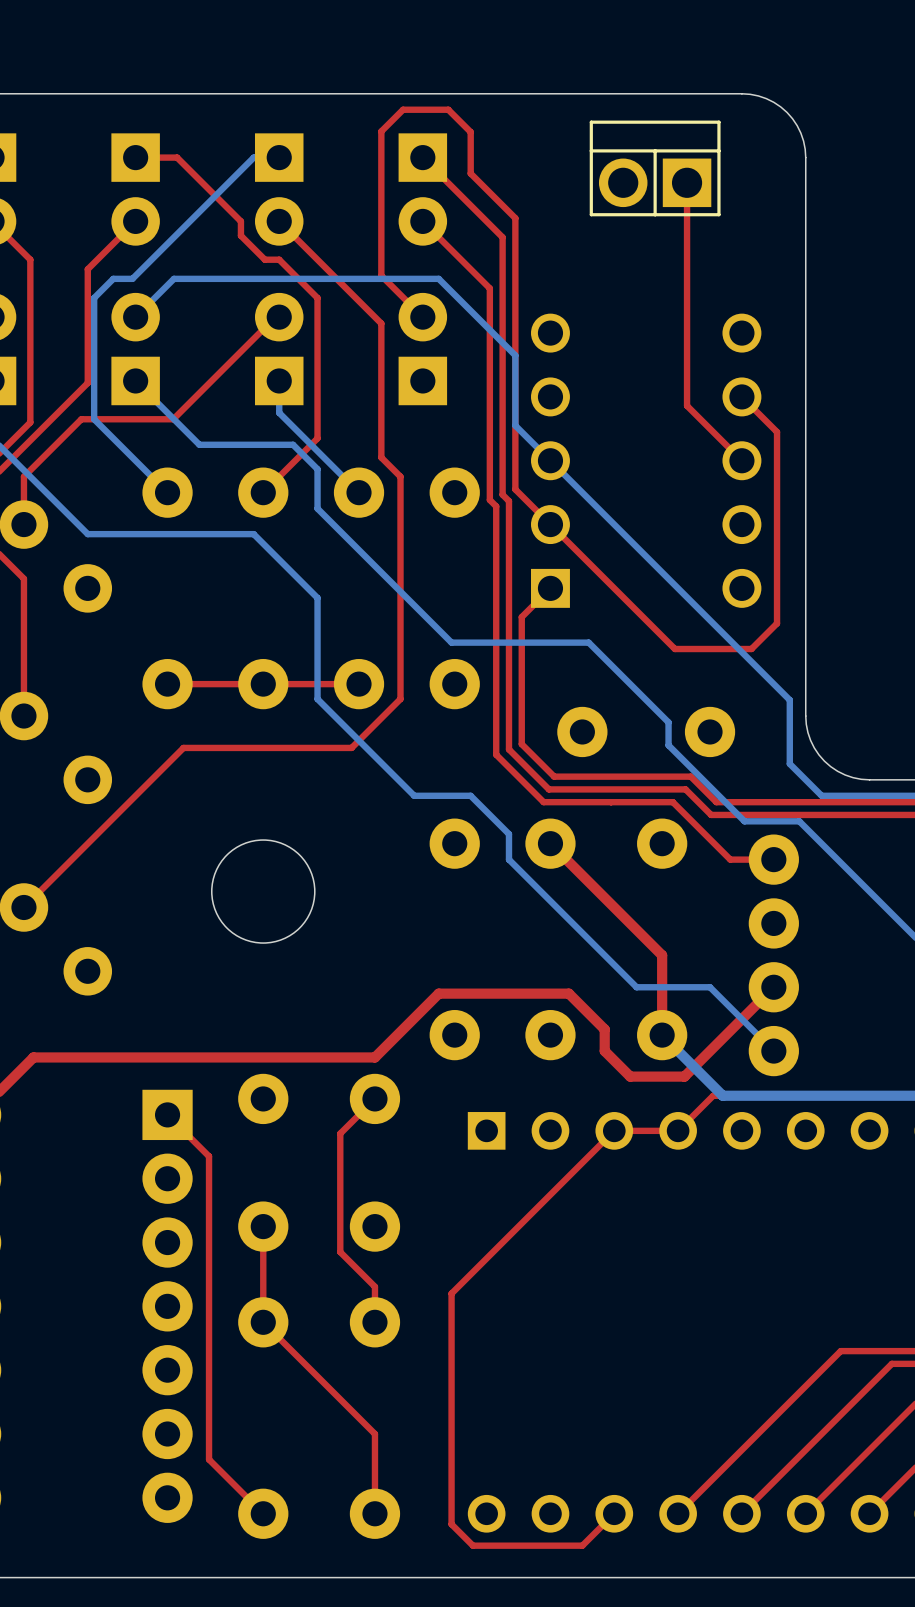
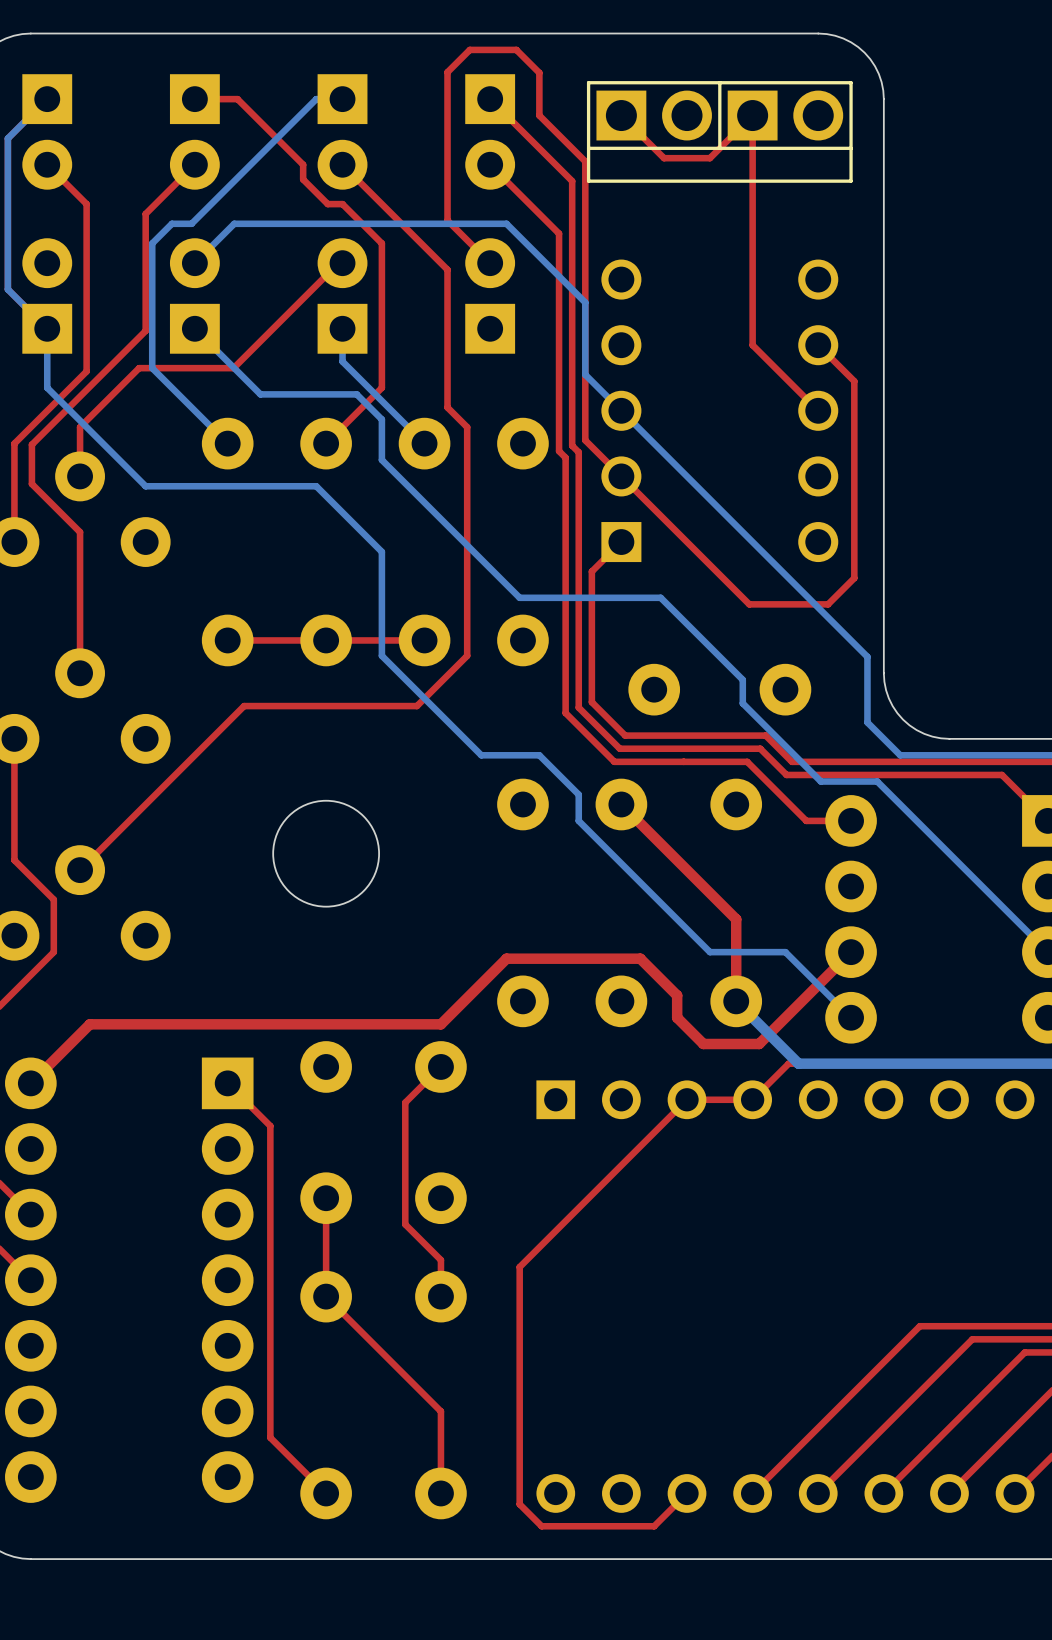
part footprint: [589, 120, 721, 217] -> [586, 81, 853, 183]
top track: (687, 182) (687, 405) -> (621, 115) (664, 158) (709, 158) (752, 115) (752, 345) (761, 354)

